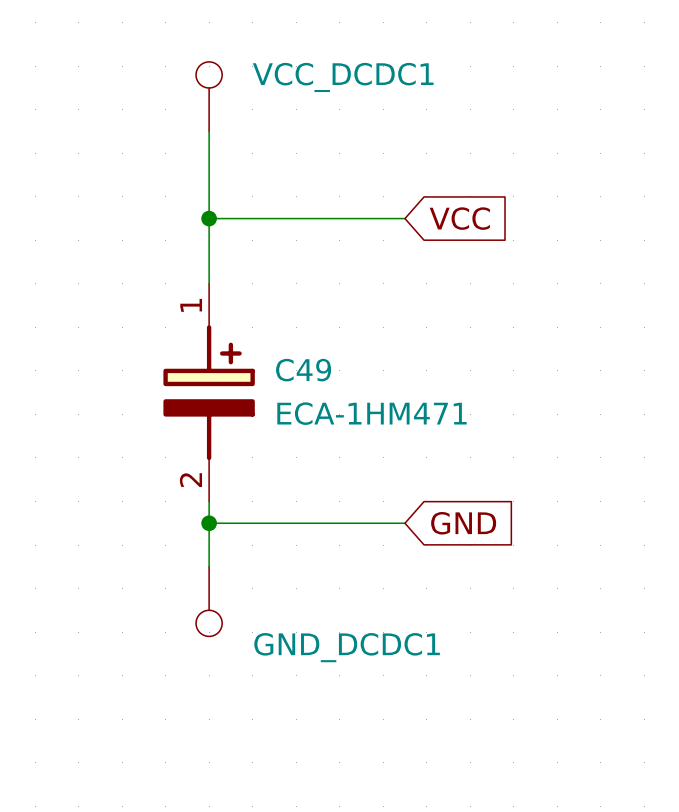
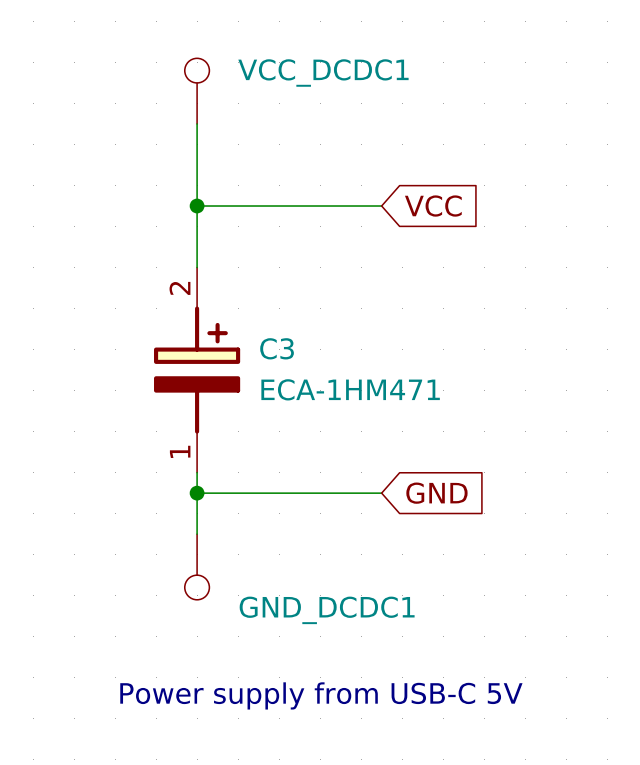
C49 pin number: 1 (191, 305) -> 2 (179, 288)
C49 name: C49 (303, 370) -> C3 (277, 348)
C49 pin number: 2 (190, 480) -> 1 (180, 451)
text: none -> Power supply from USB-C 5V (321, 695)

